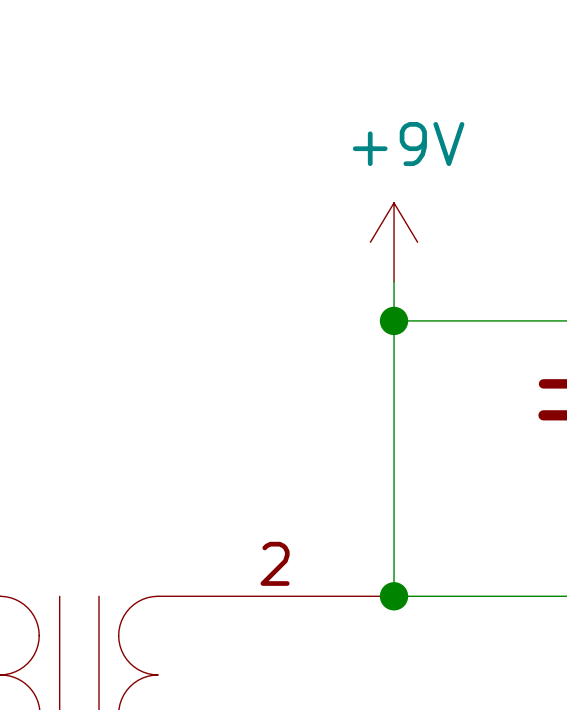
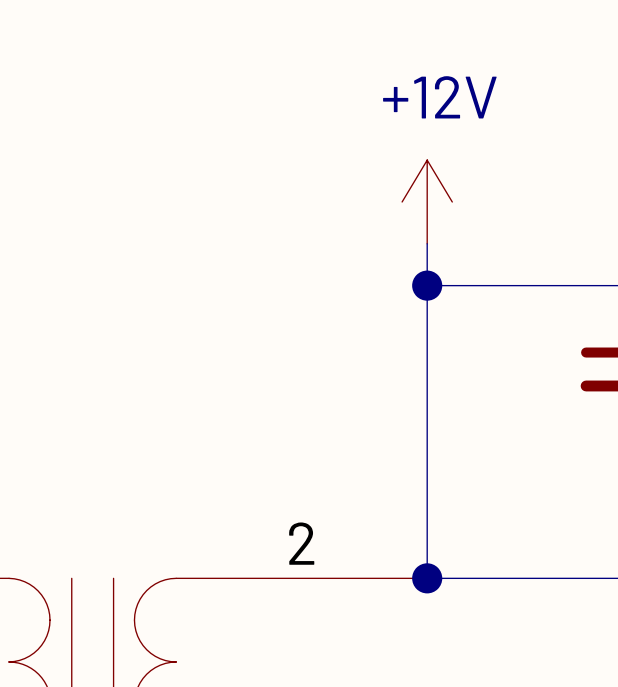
power symbol: +9V (394, 242) -> +12V (427, 201)

